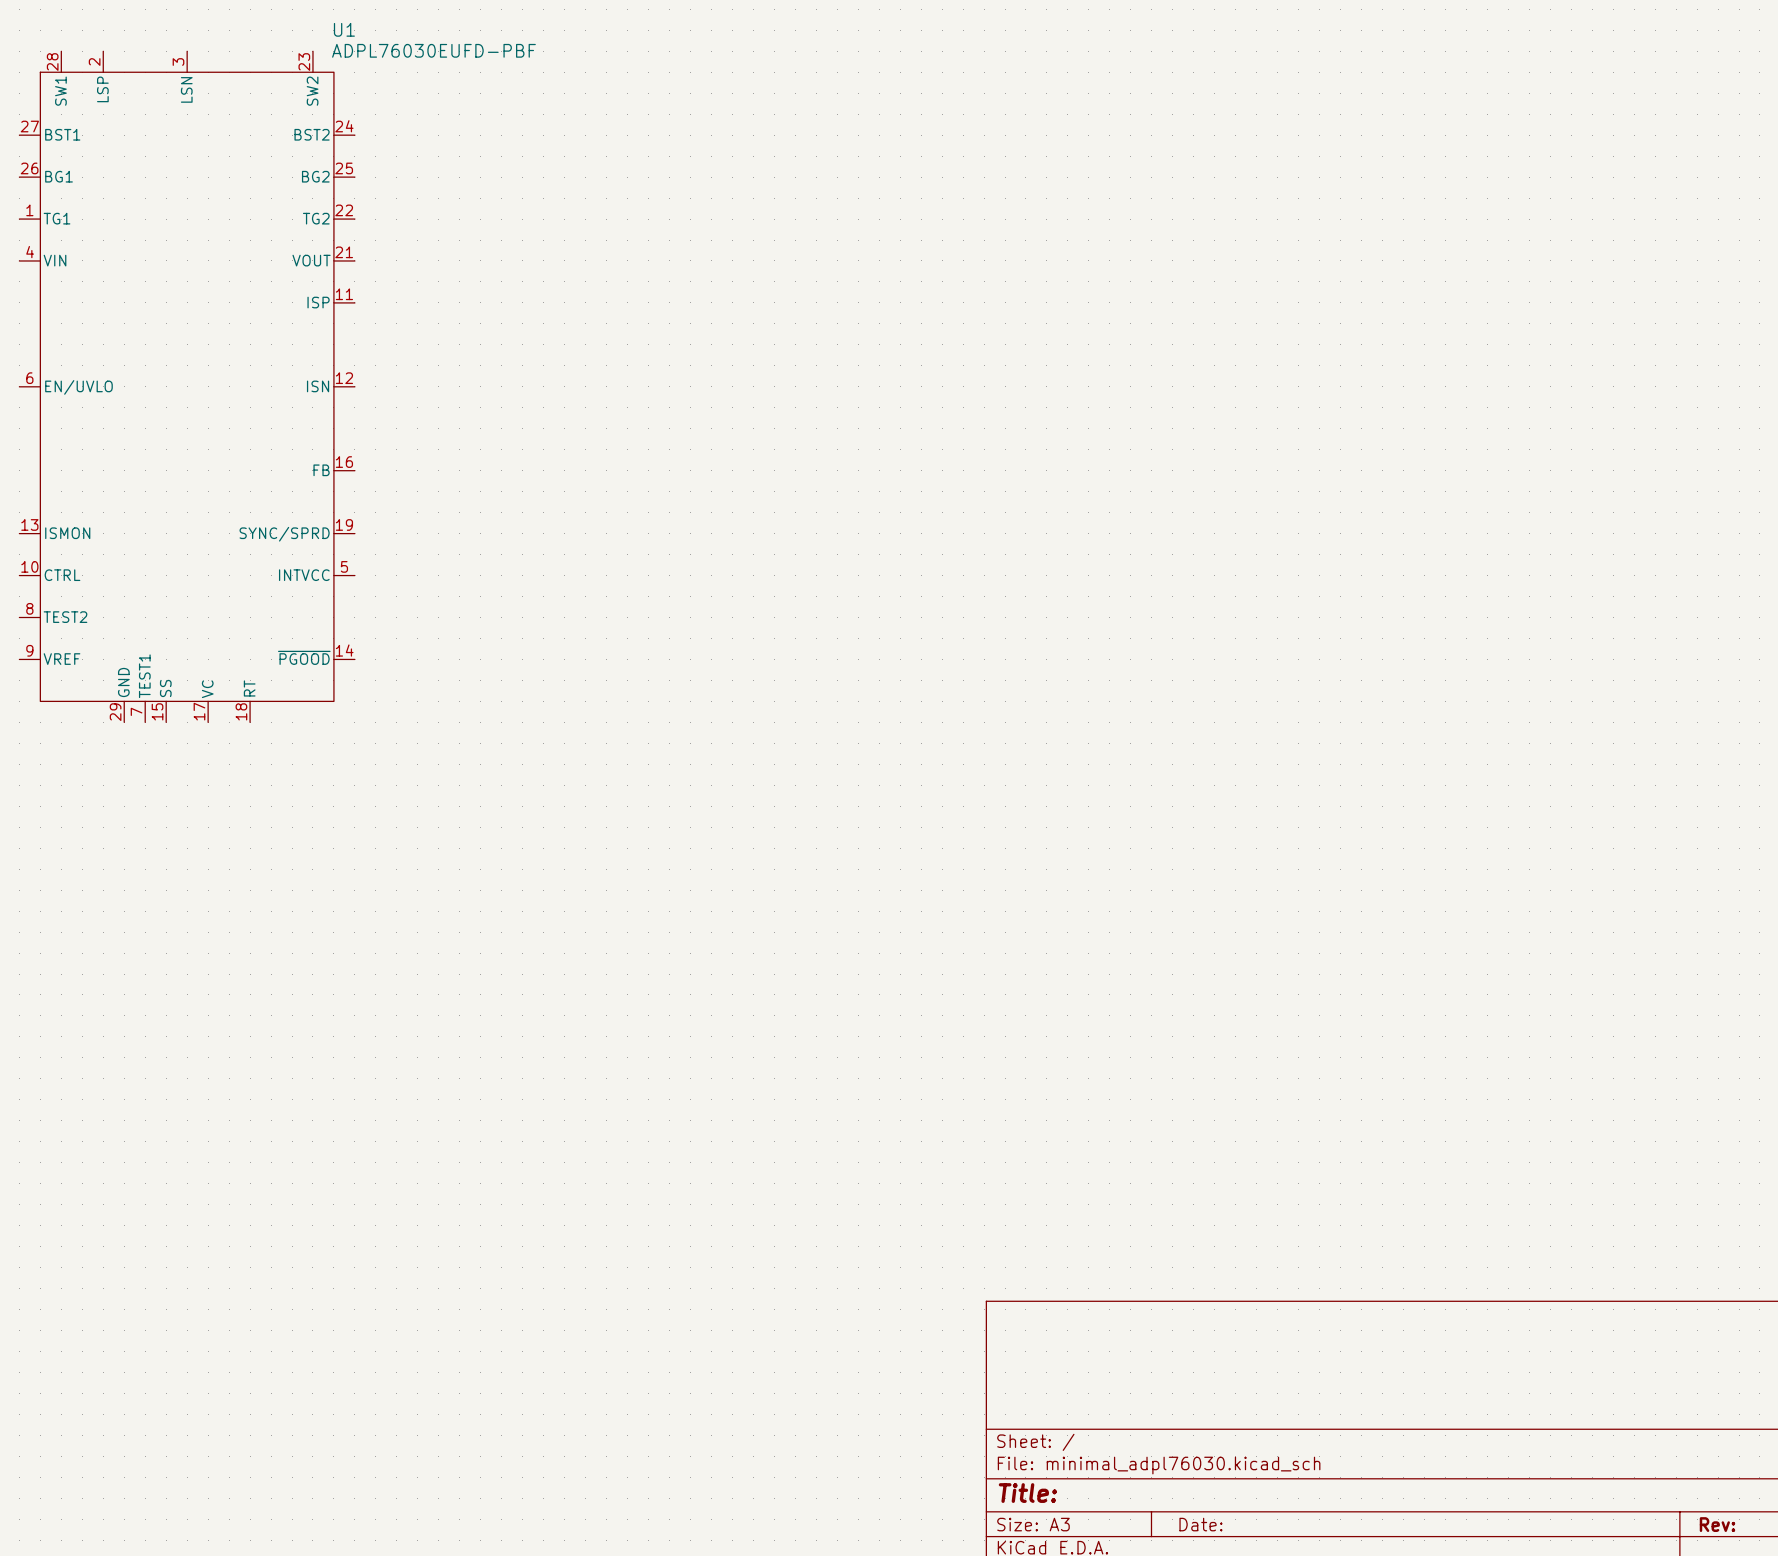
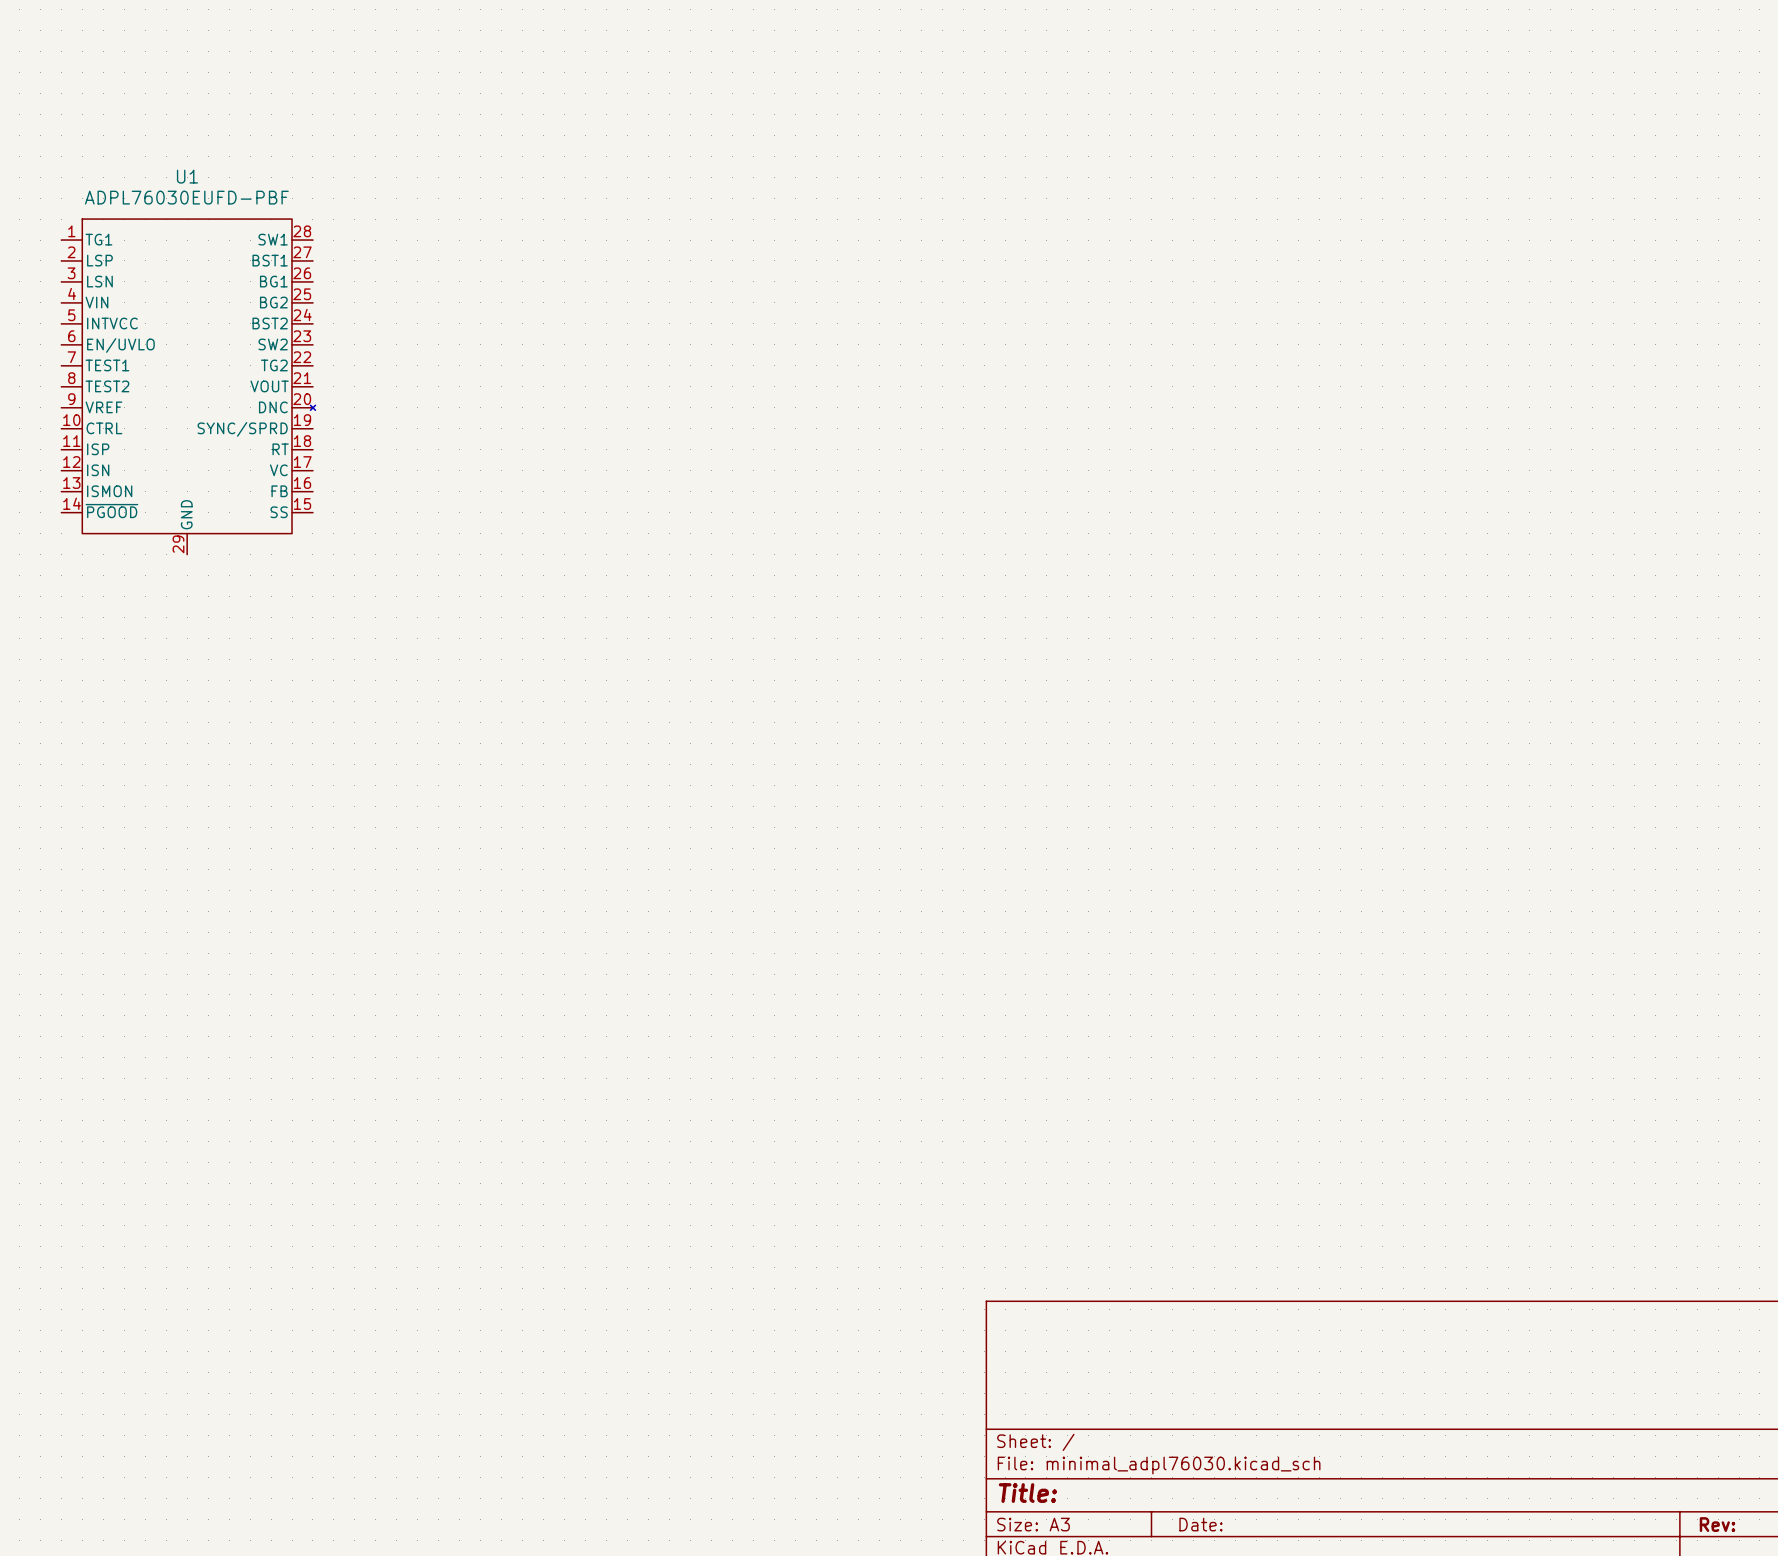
U1 name position: U1 (344, 29) -> U1 (187, 176)
U1 value position: ADPL76030EUFD-PBF (433, 50) -> ADPL76030EUFD-PBF (186, 197)
U1 symbol: [19, 51, 355, 723] -> [61, 219, 316, 555]

